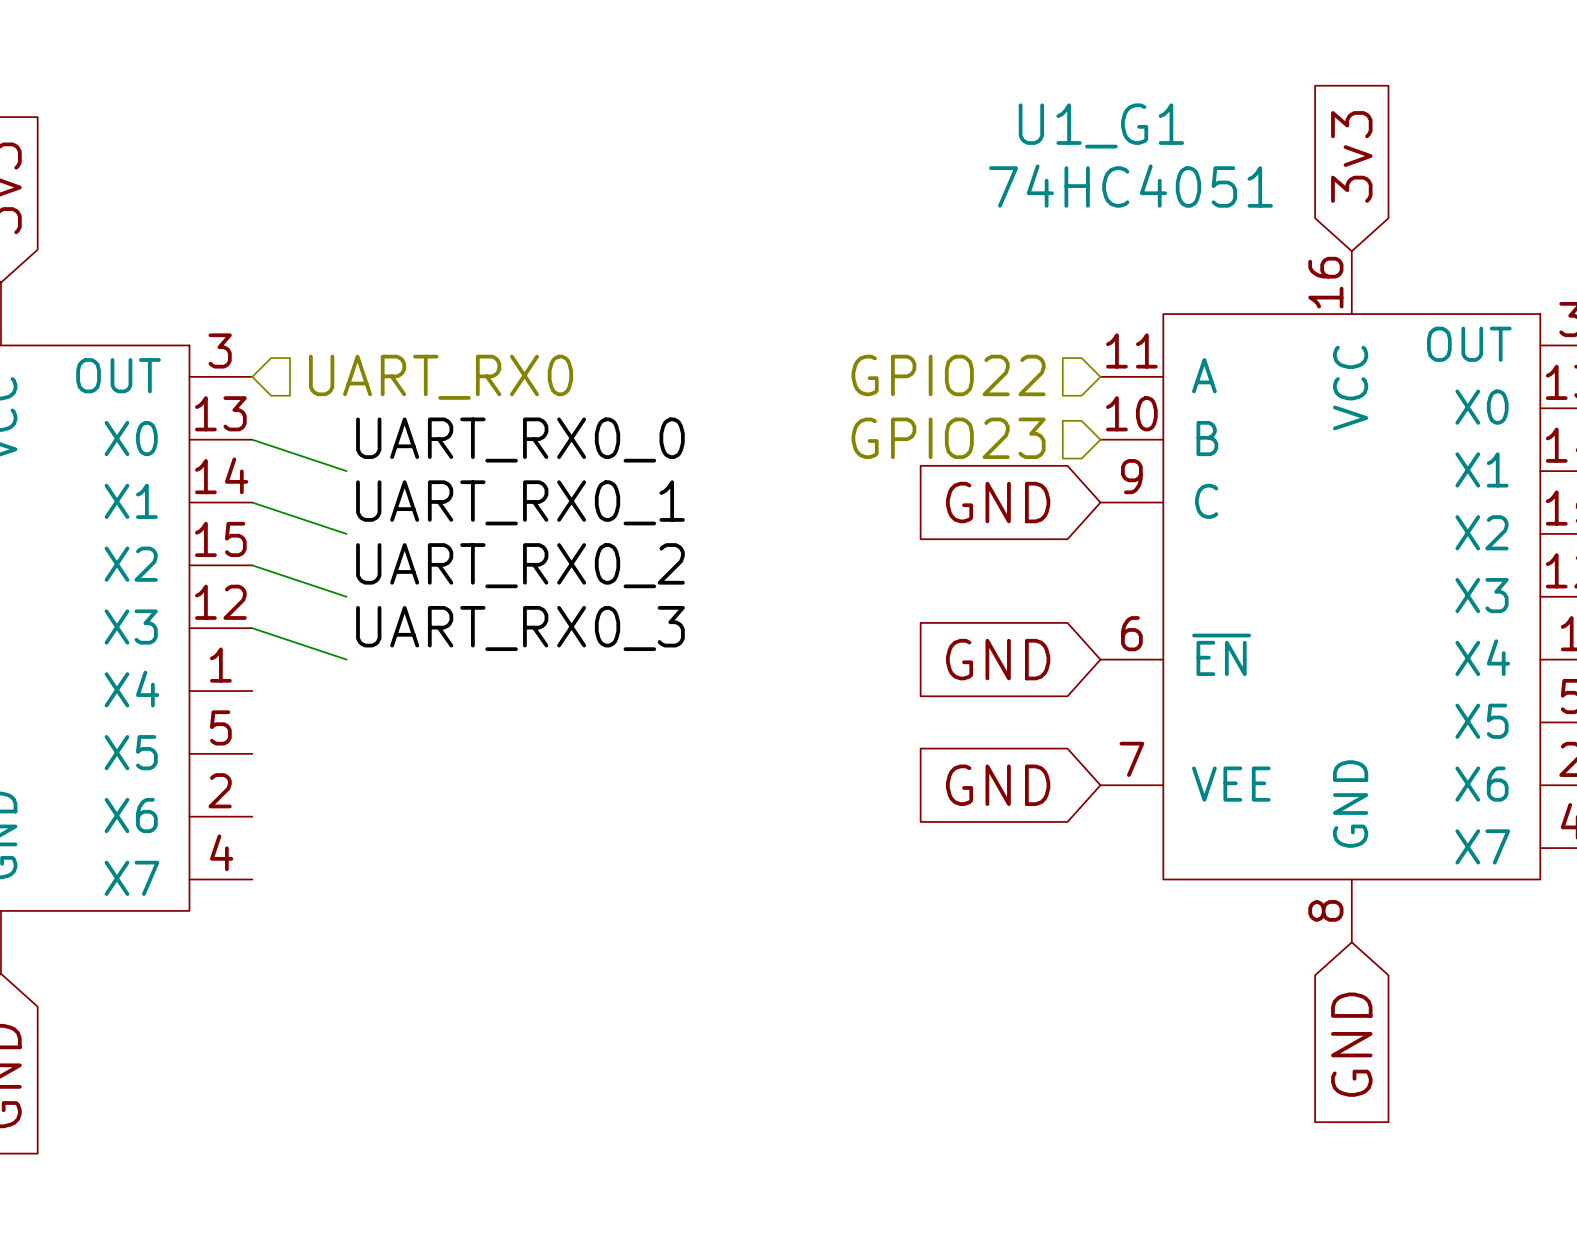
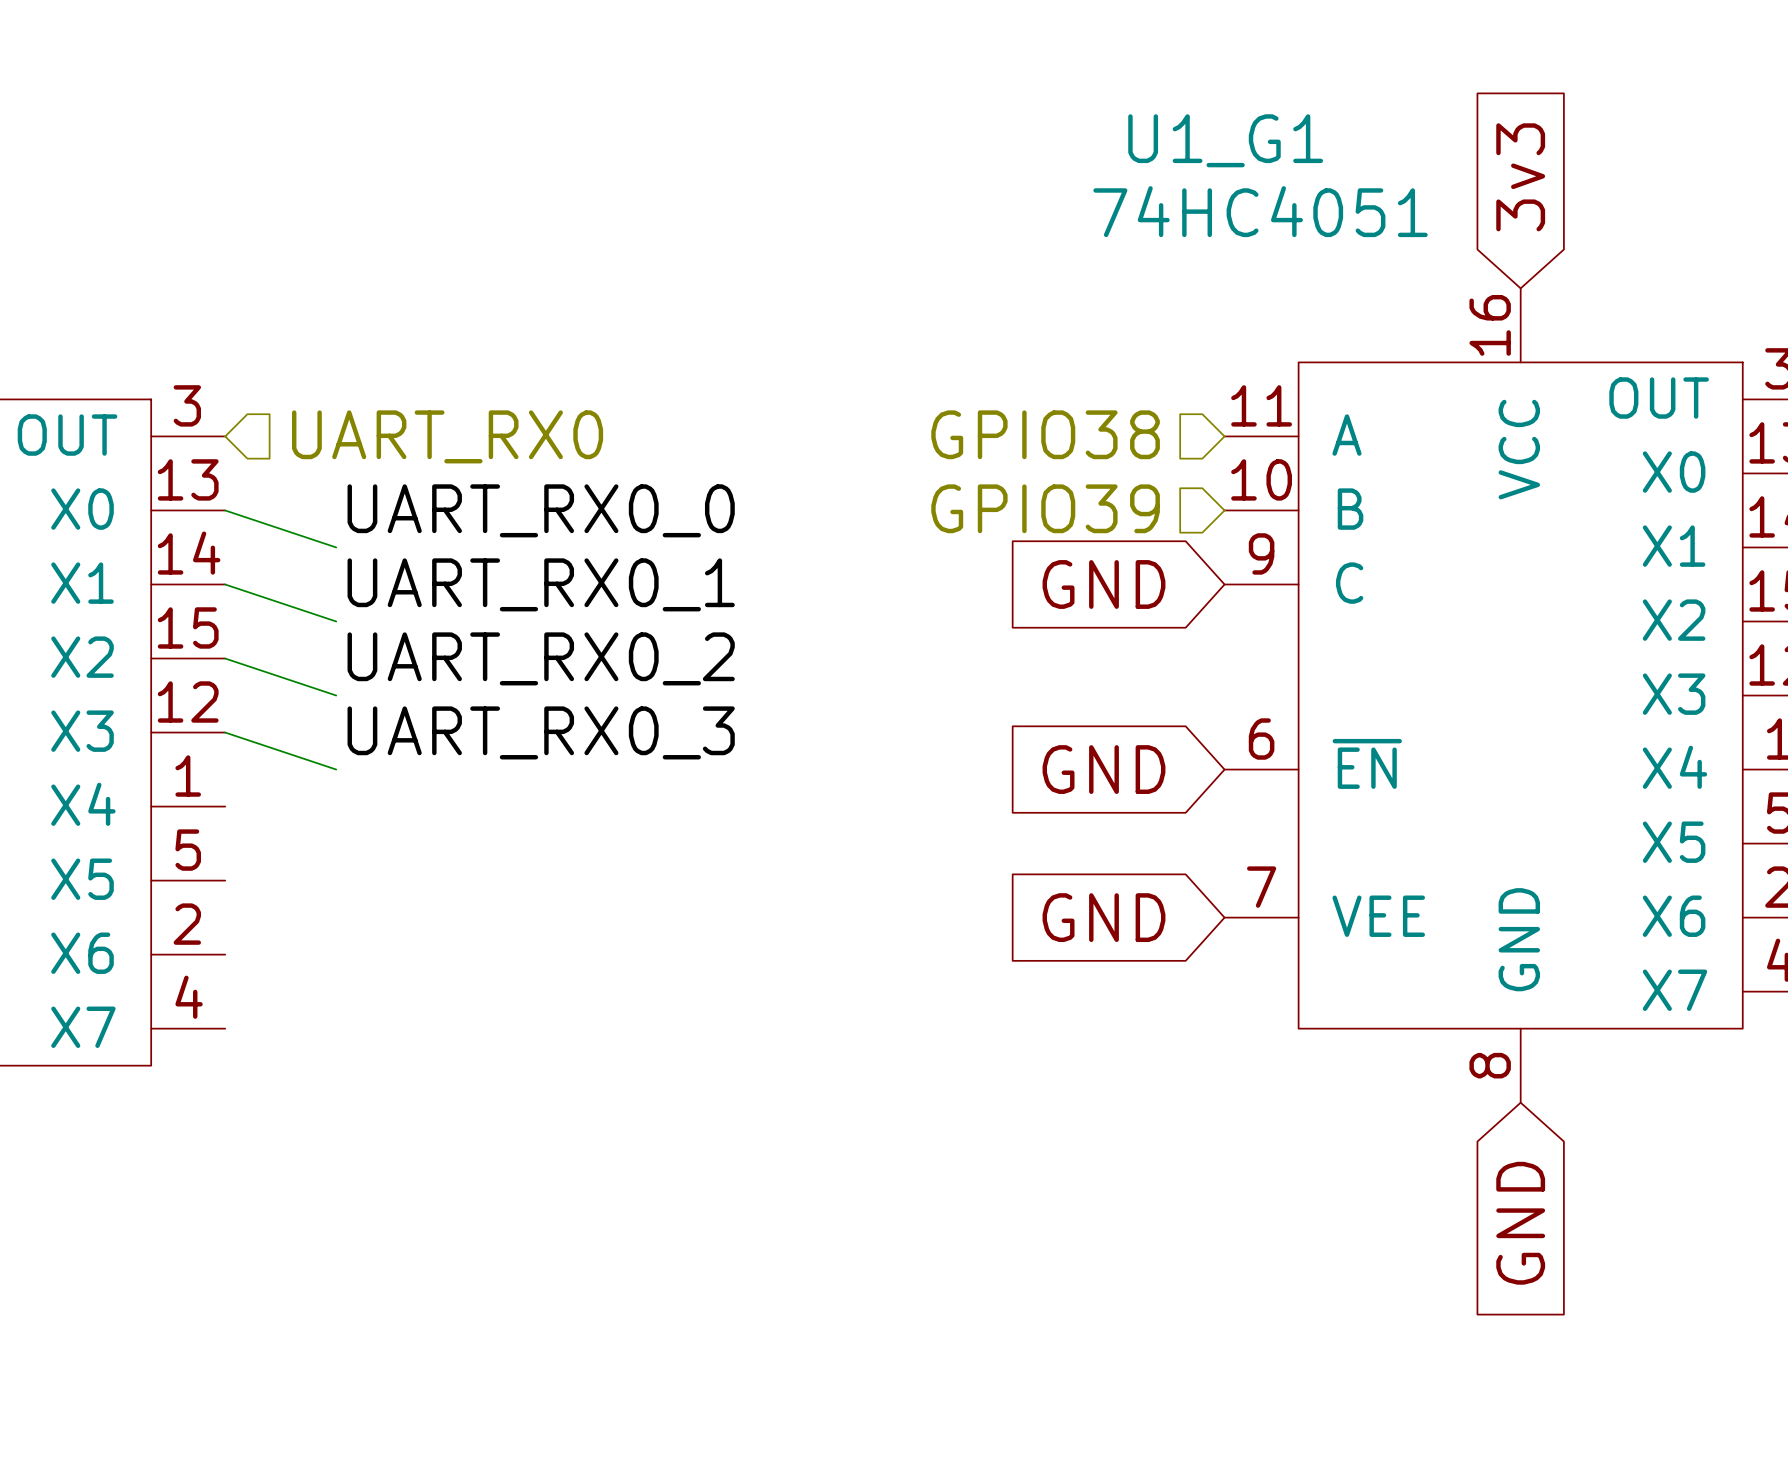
hierarchical label: GPIO22 (948, 375) -> GPIO38 (1045, 434)
hierarchical label: GPIO23 (948, 438) -> GPIO39 (1045, 508)

